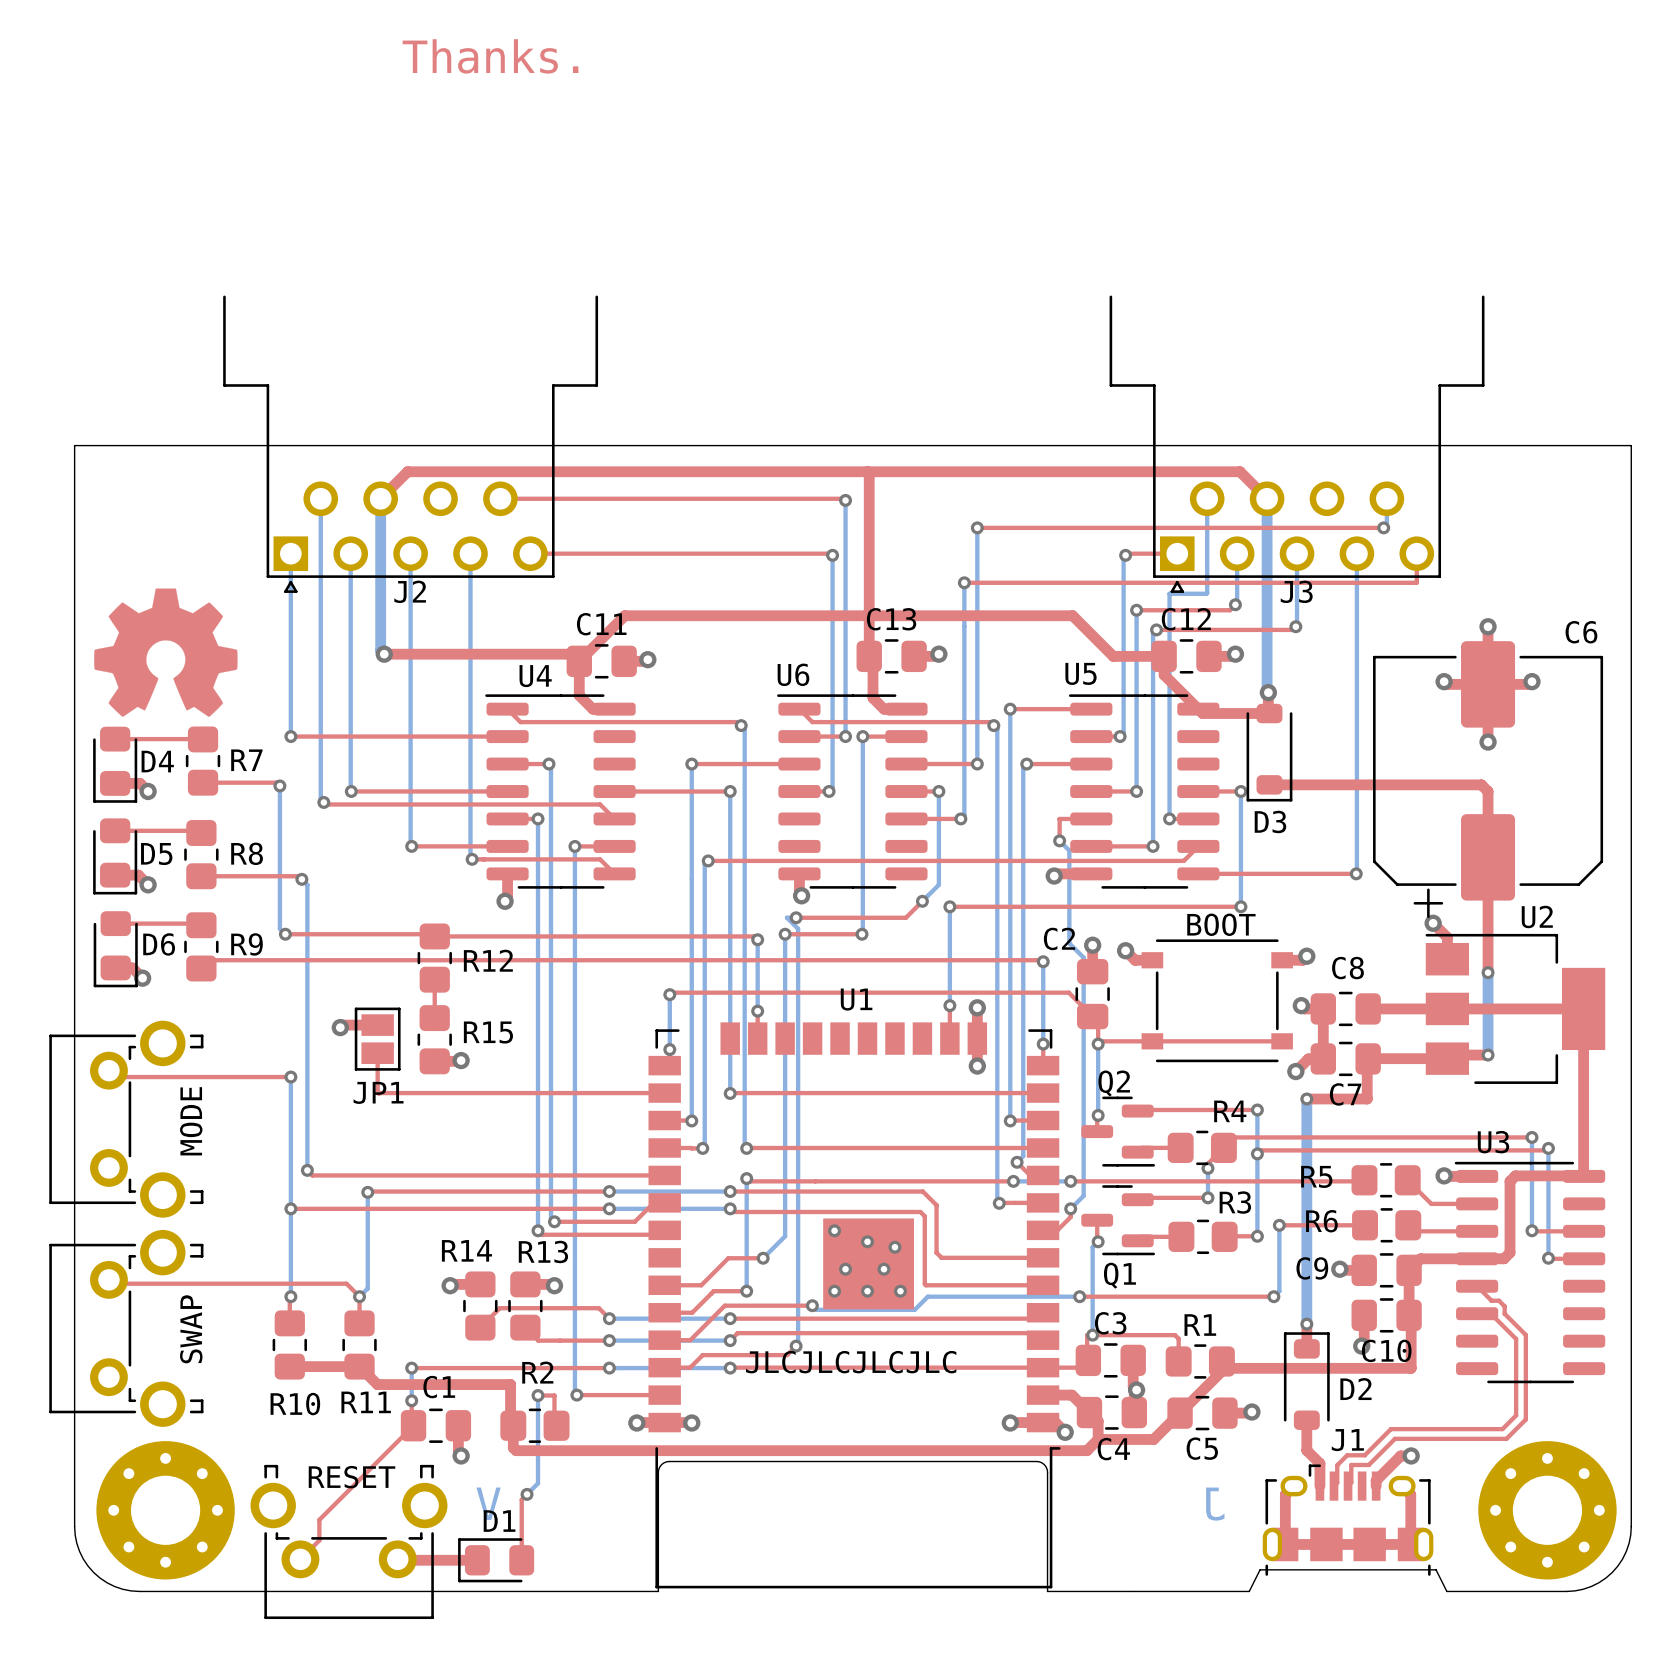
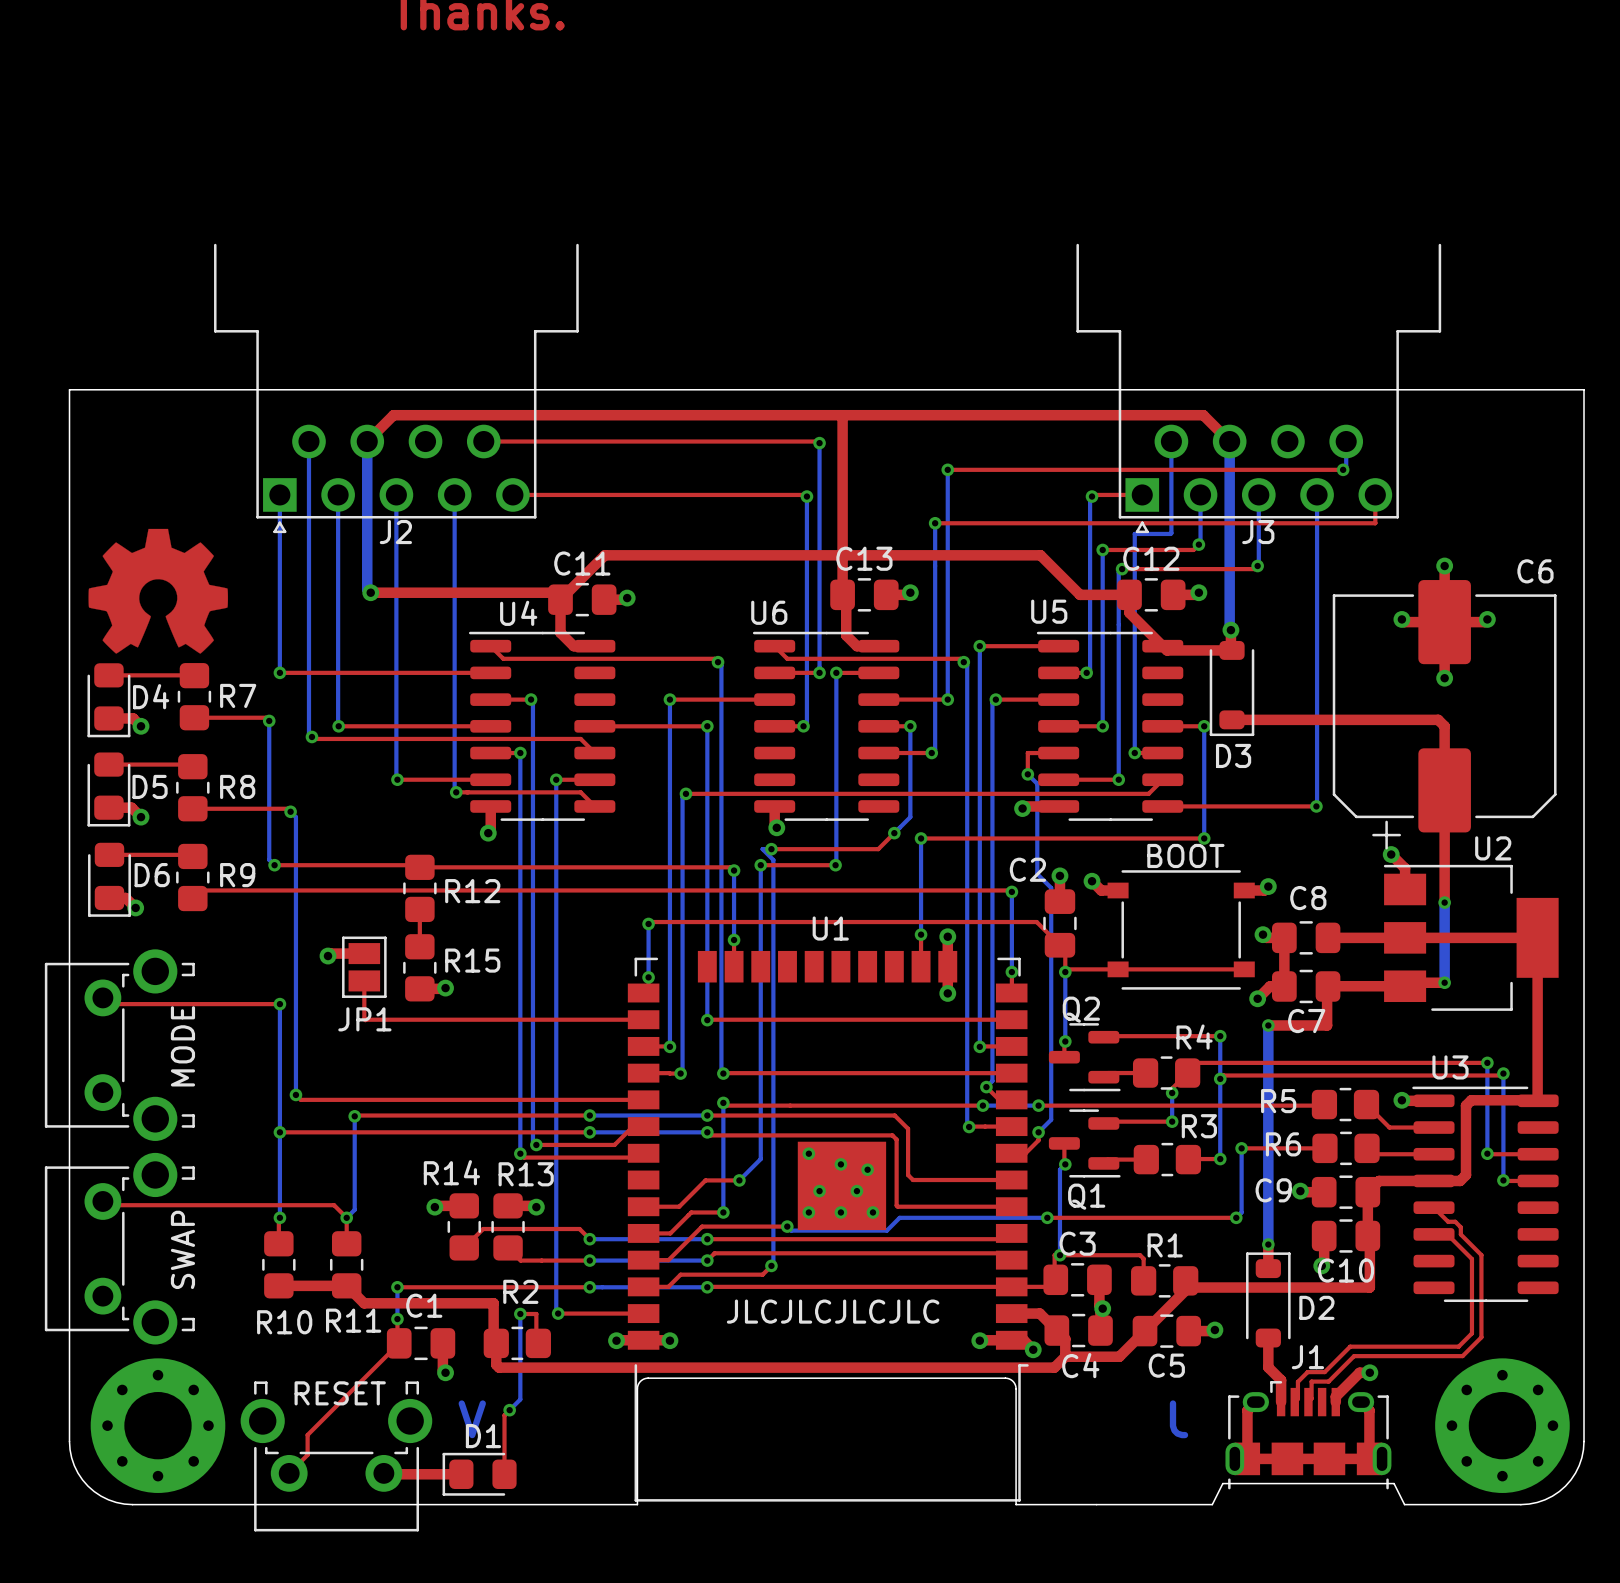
text position: JLCJLCJLCJLC (851, 1362) -> JLCJLCJLCJLC (833, 1311)

